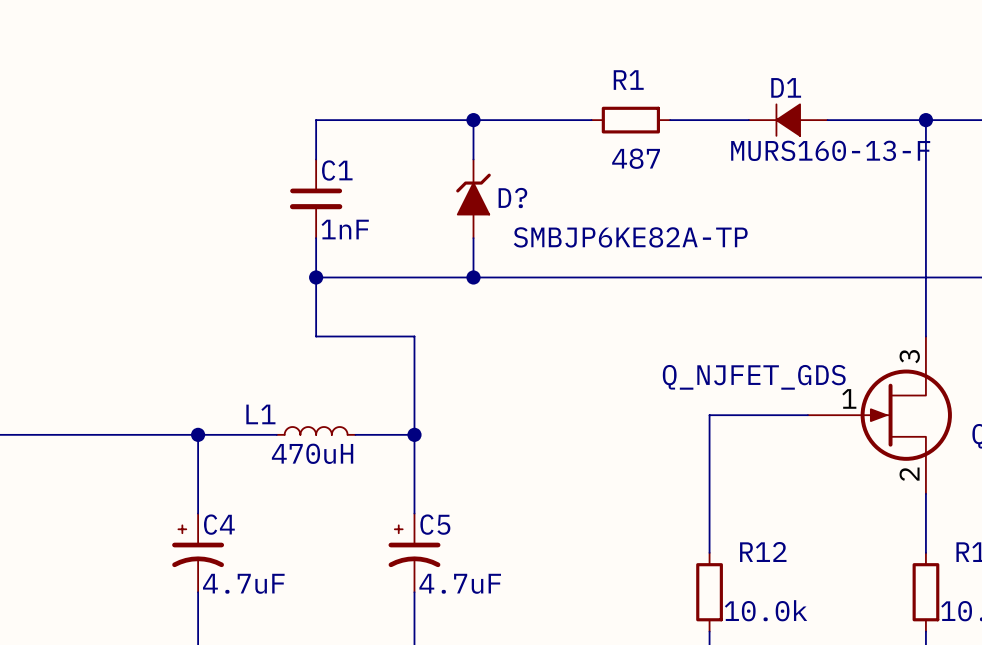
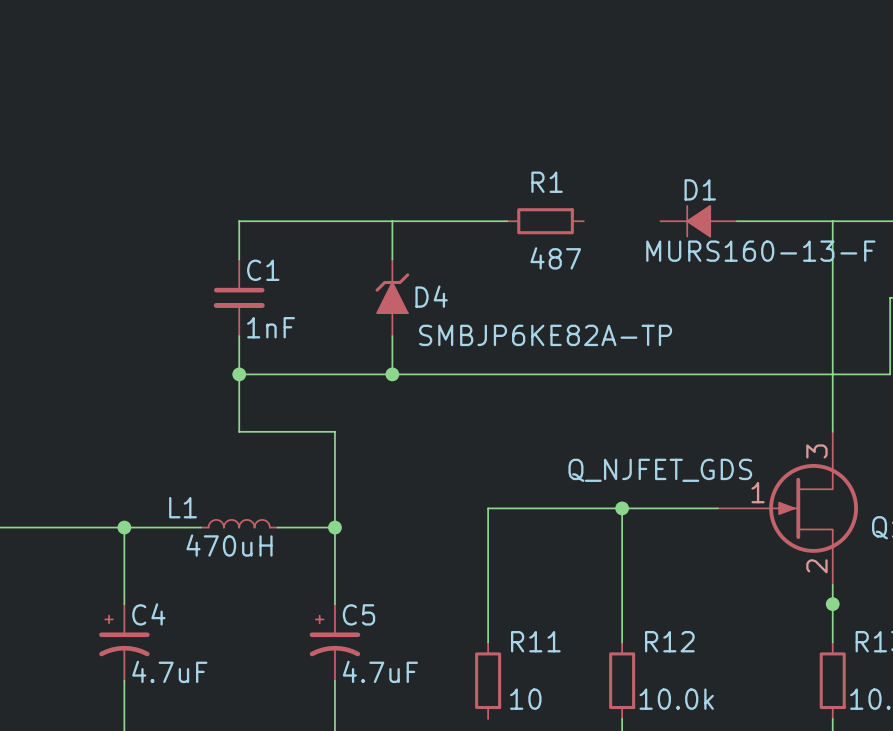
junction: (473, 120) -> none
wire: (670, 120) (748, 120) -> none
junction: (925, 120) -> none
D? name: D? (512, 198) -> D4 (431, 296)
wire: none -> (622, 508) (488, 508) (488, 642)
junction: none -> (622, 508)
junction: none -> (832, 604)
R11: none -> 10 (488, 680)

